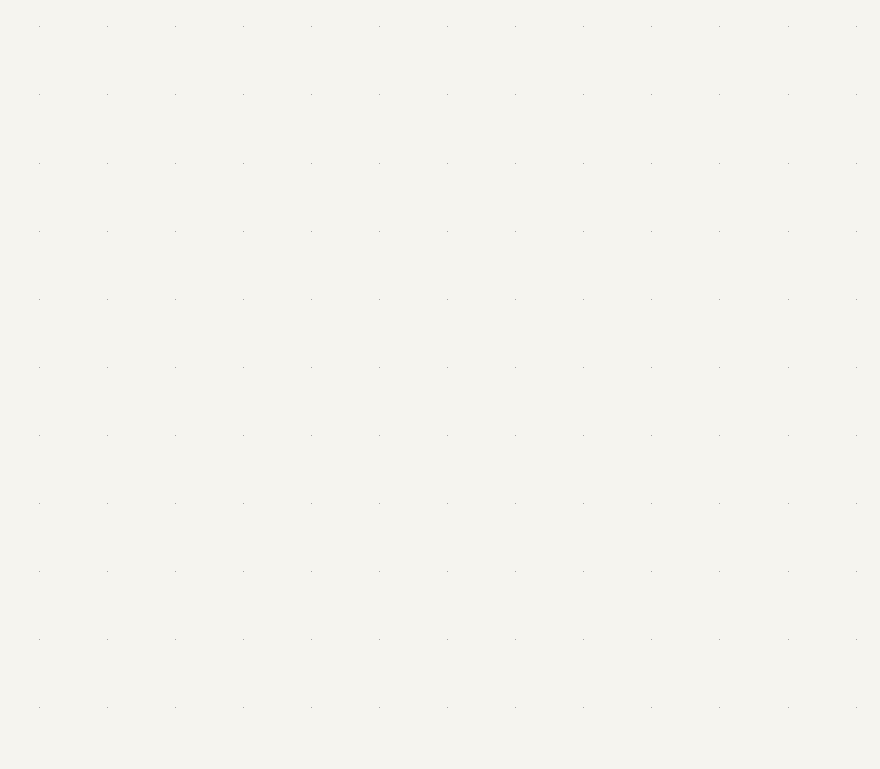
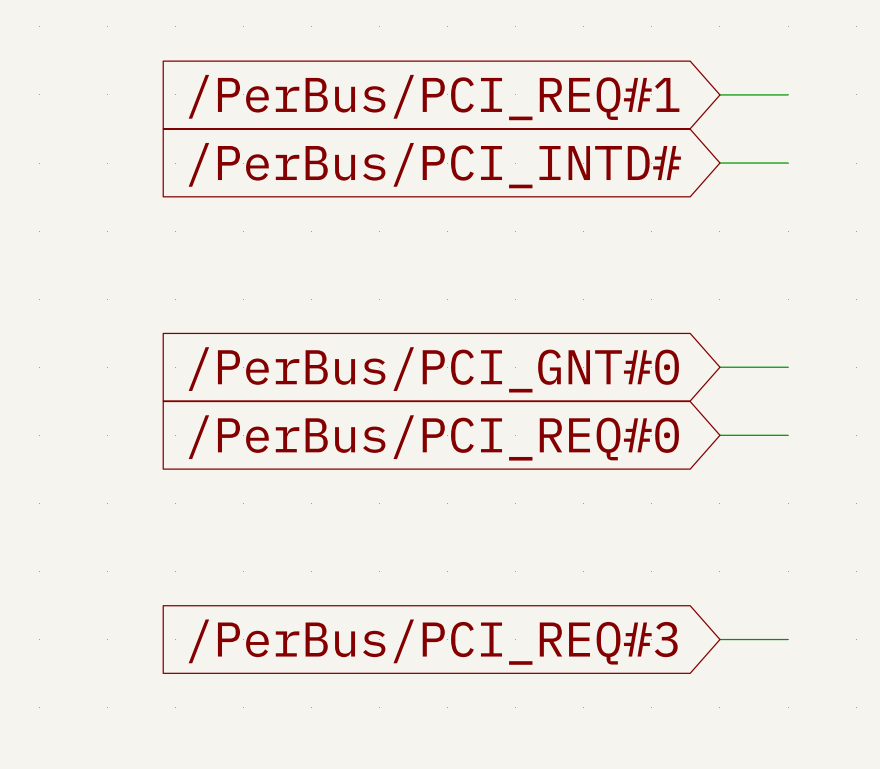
wire: none -> (719, 94) (788, 94)
global label: none -> /PerBus/PCI_REQ#1 (434, 97)
wire: none -> (719, 163) (788, 163)
global label: none -> /PerBus/PCI_INTD# (434, 165)
wire: none -> (719, 367) (788, 367)
global label: none -> /PerBus/PCI_GNT#0 (433, 369)
wire: none -> (719, 435) (788, 435)
global label: none -> /PerBus/PCI_REQ#0 (433, 437)
wire: none -> (719, 639) (788, 639)
global label: none -> /PerBus/PCI_REQ#3 (433, 642)

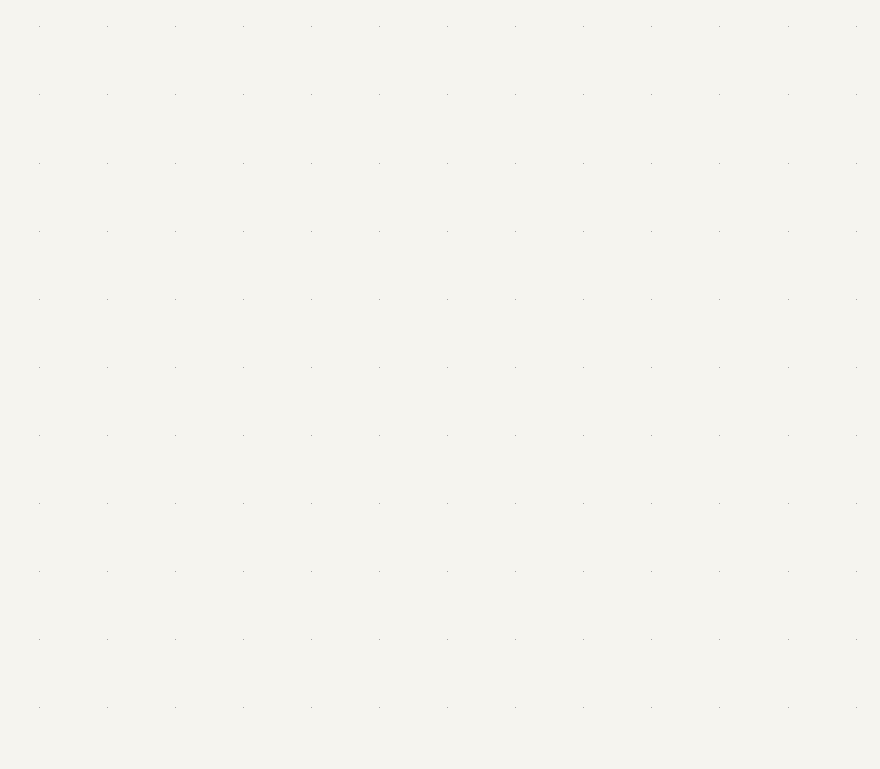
wire: (719, 94) (788, 94) -> none
global label: /PerBus/PCI_REQ#1 (434, 97) -> none
wire: (719, 163) (788, 163) -> none
global label: /PerBus/PCI_INTD# (434, 165) -> none
wire: (719, 367) (788, 367) -> none
global label: /PerBus/PCI_GNT#0 (433, 369) -> none
wire: (719, 435) (788, 435) -> none
global label: /PerBus/PCI_REQ#0 (433, 437) -> none
wire: (719, 639) (788, 639) -> none
global label: /PerBus/PCI_REQ#3 (433, 642) -> none

